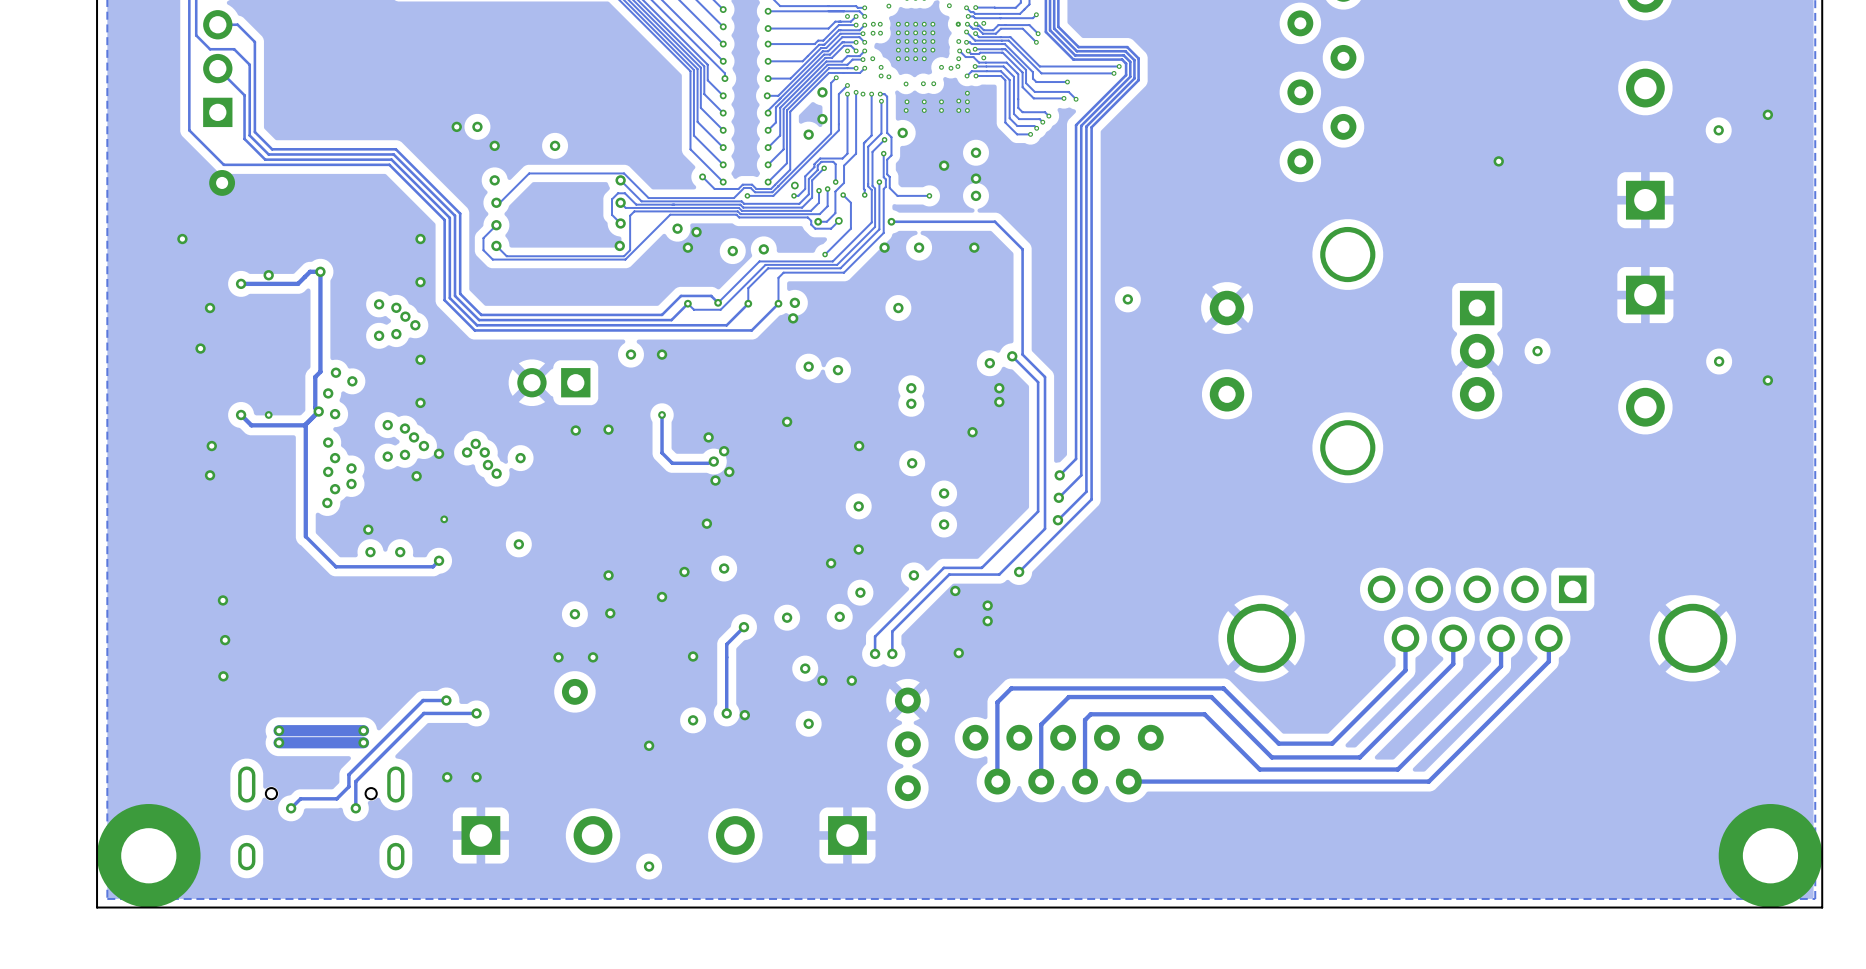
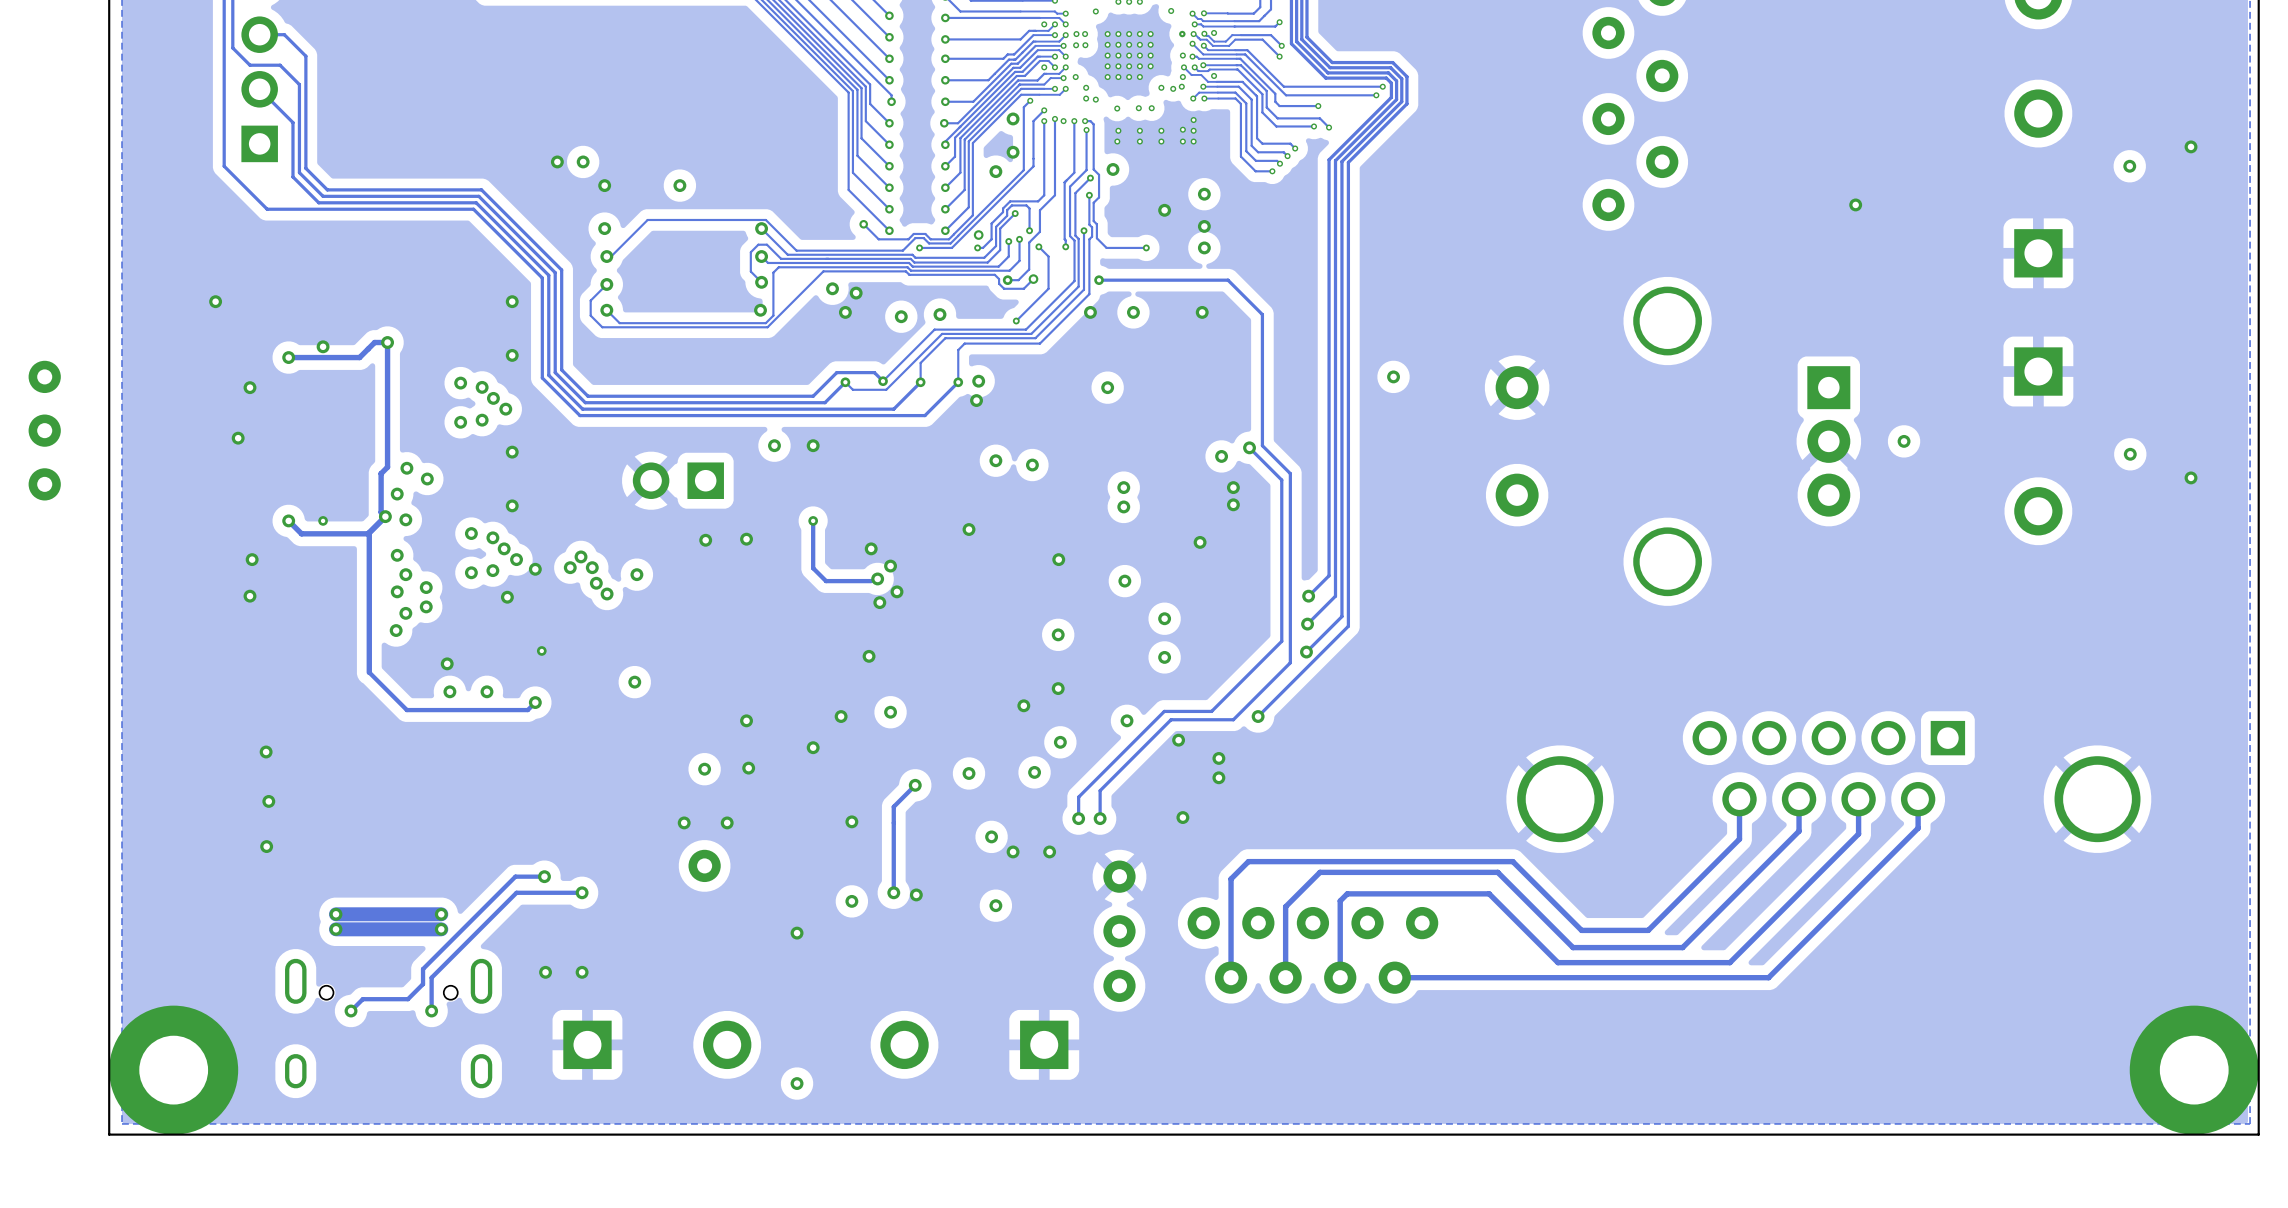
part: (222, 182) -> none
part: none -> (44, 376)
part: none -> (44, 430)
part: none -> (44, 484)

